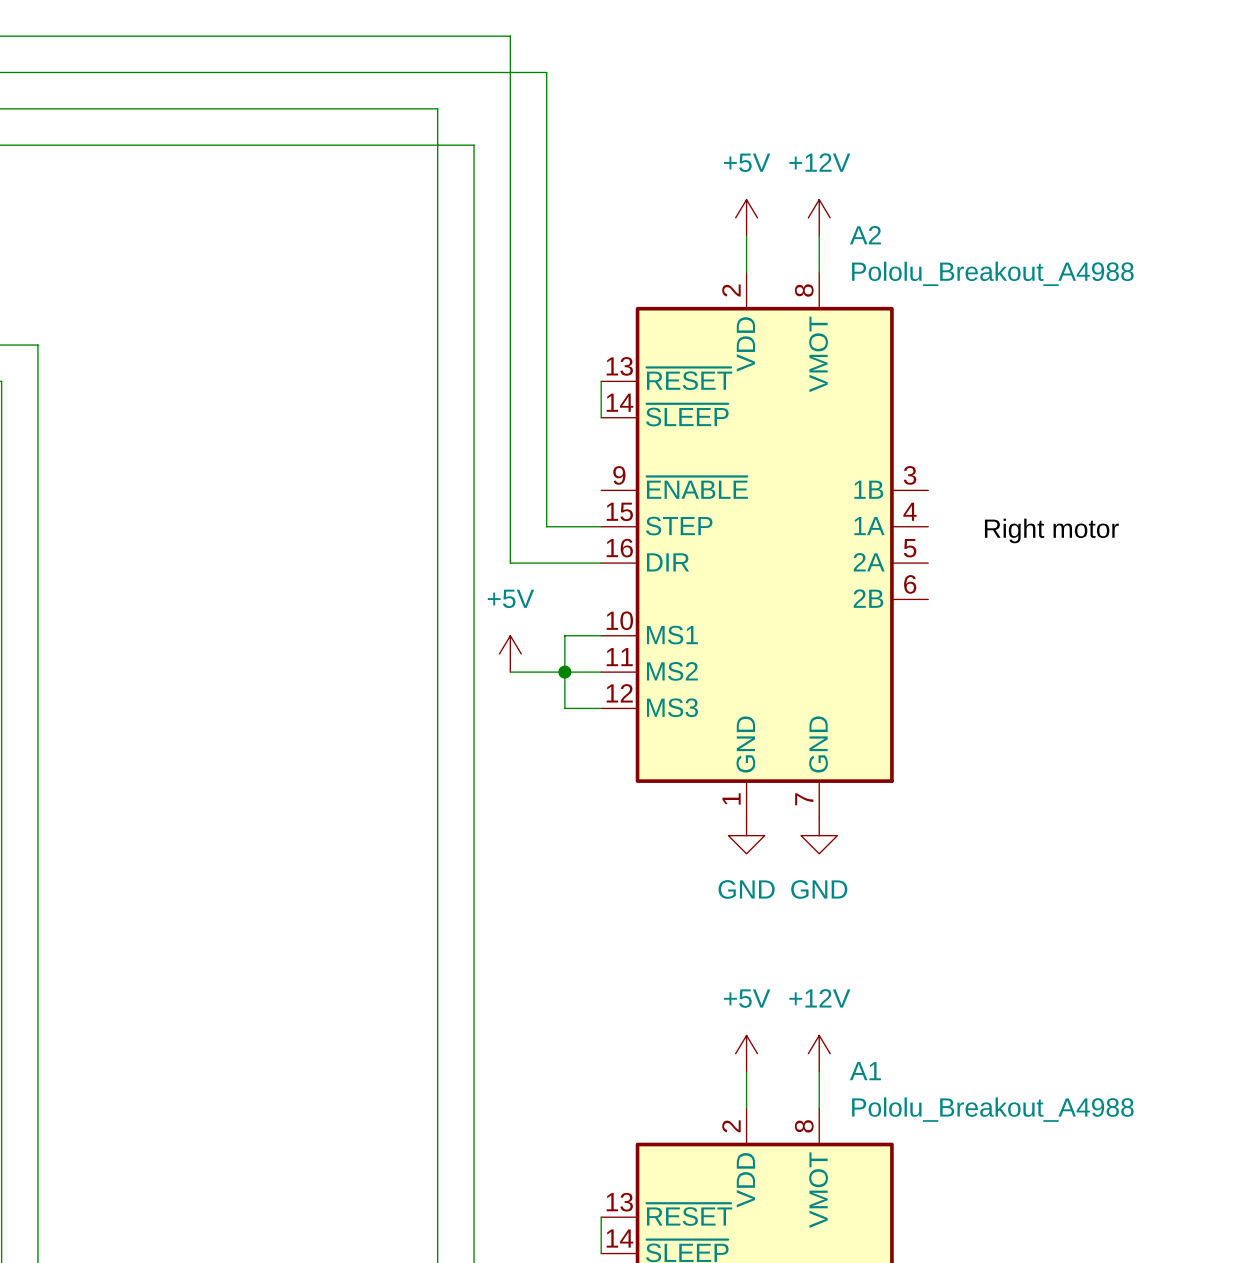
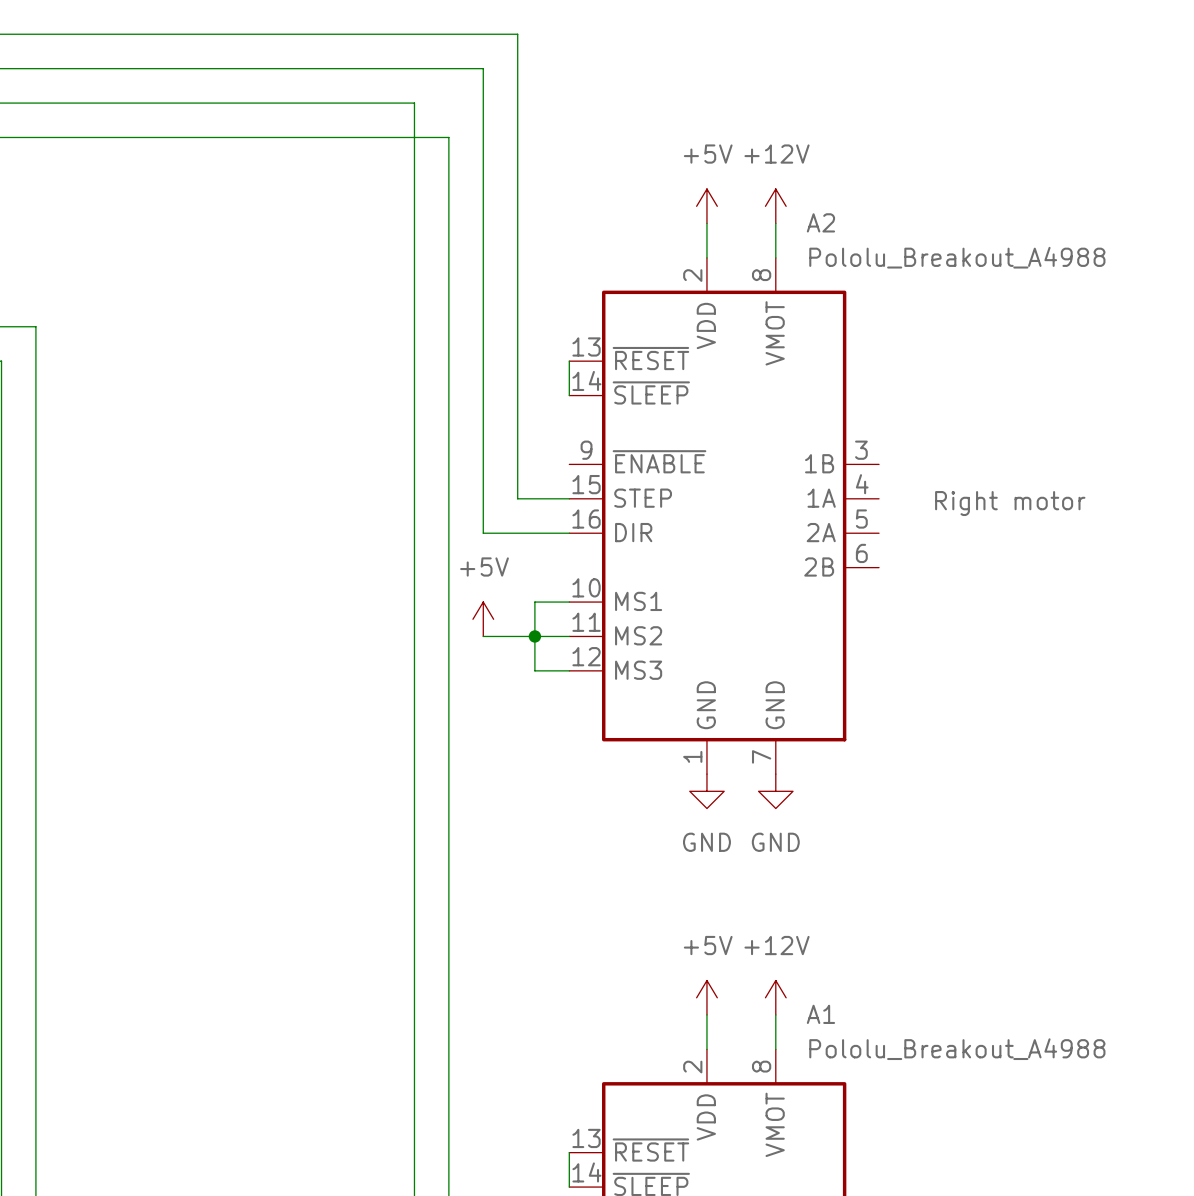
wire: (510, 36) (510, 72) (546, 72) -> (483, 34) (517, 34) (517, 68)

